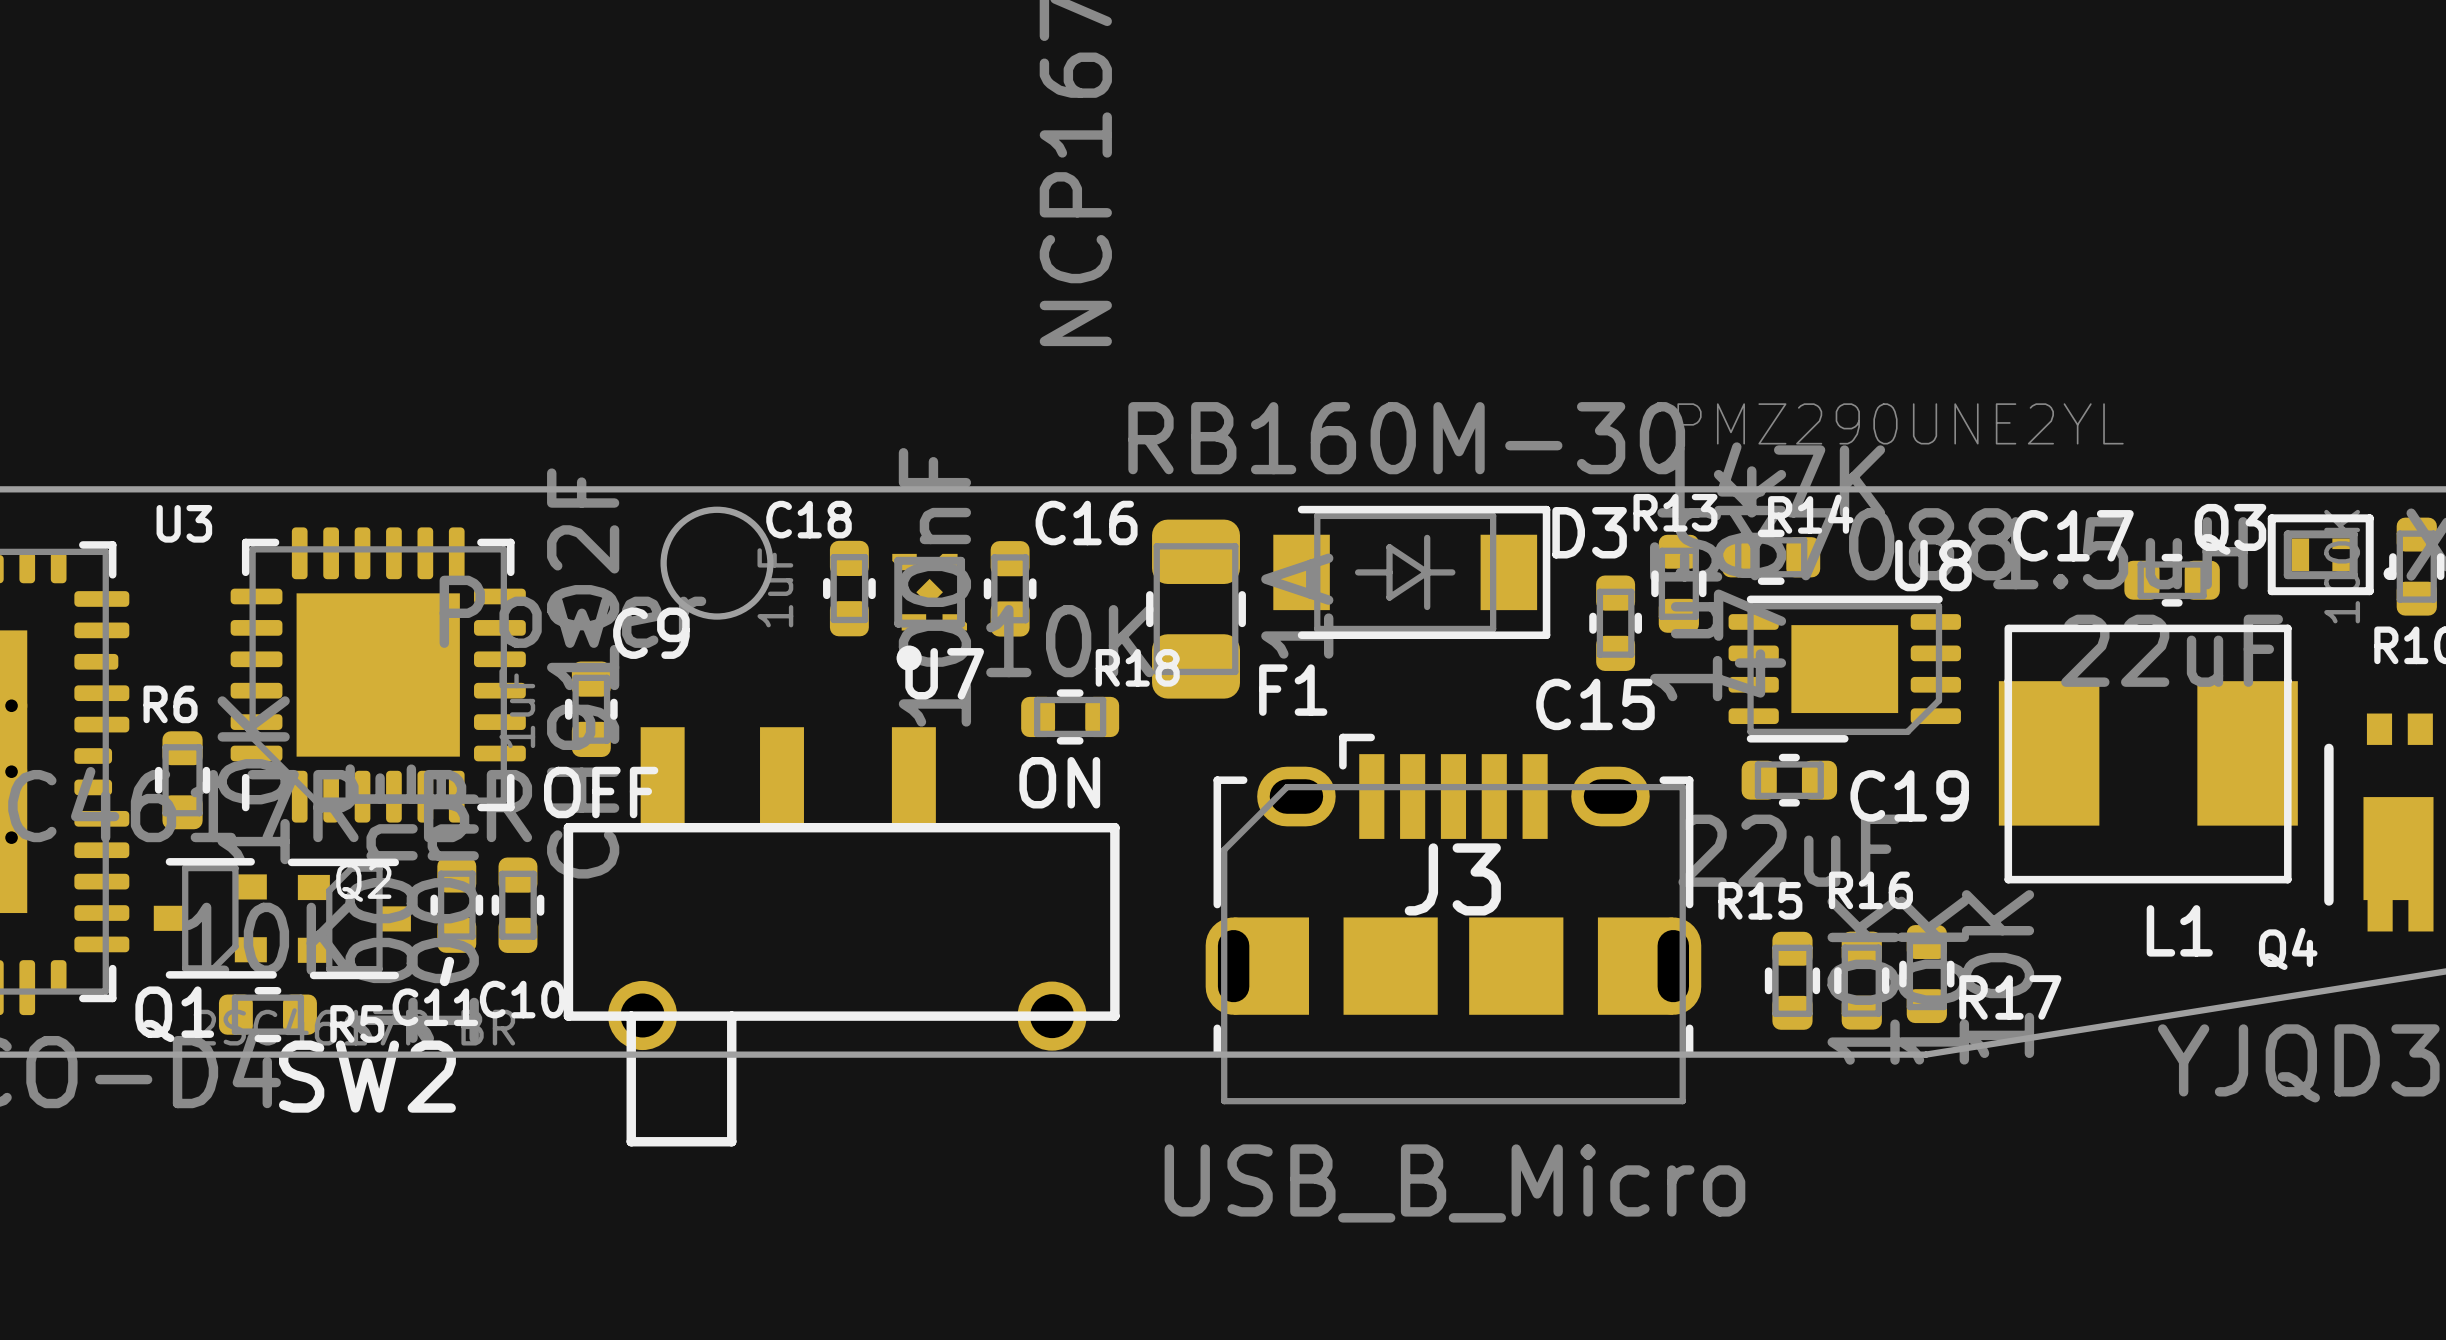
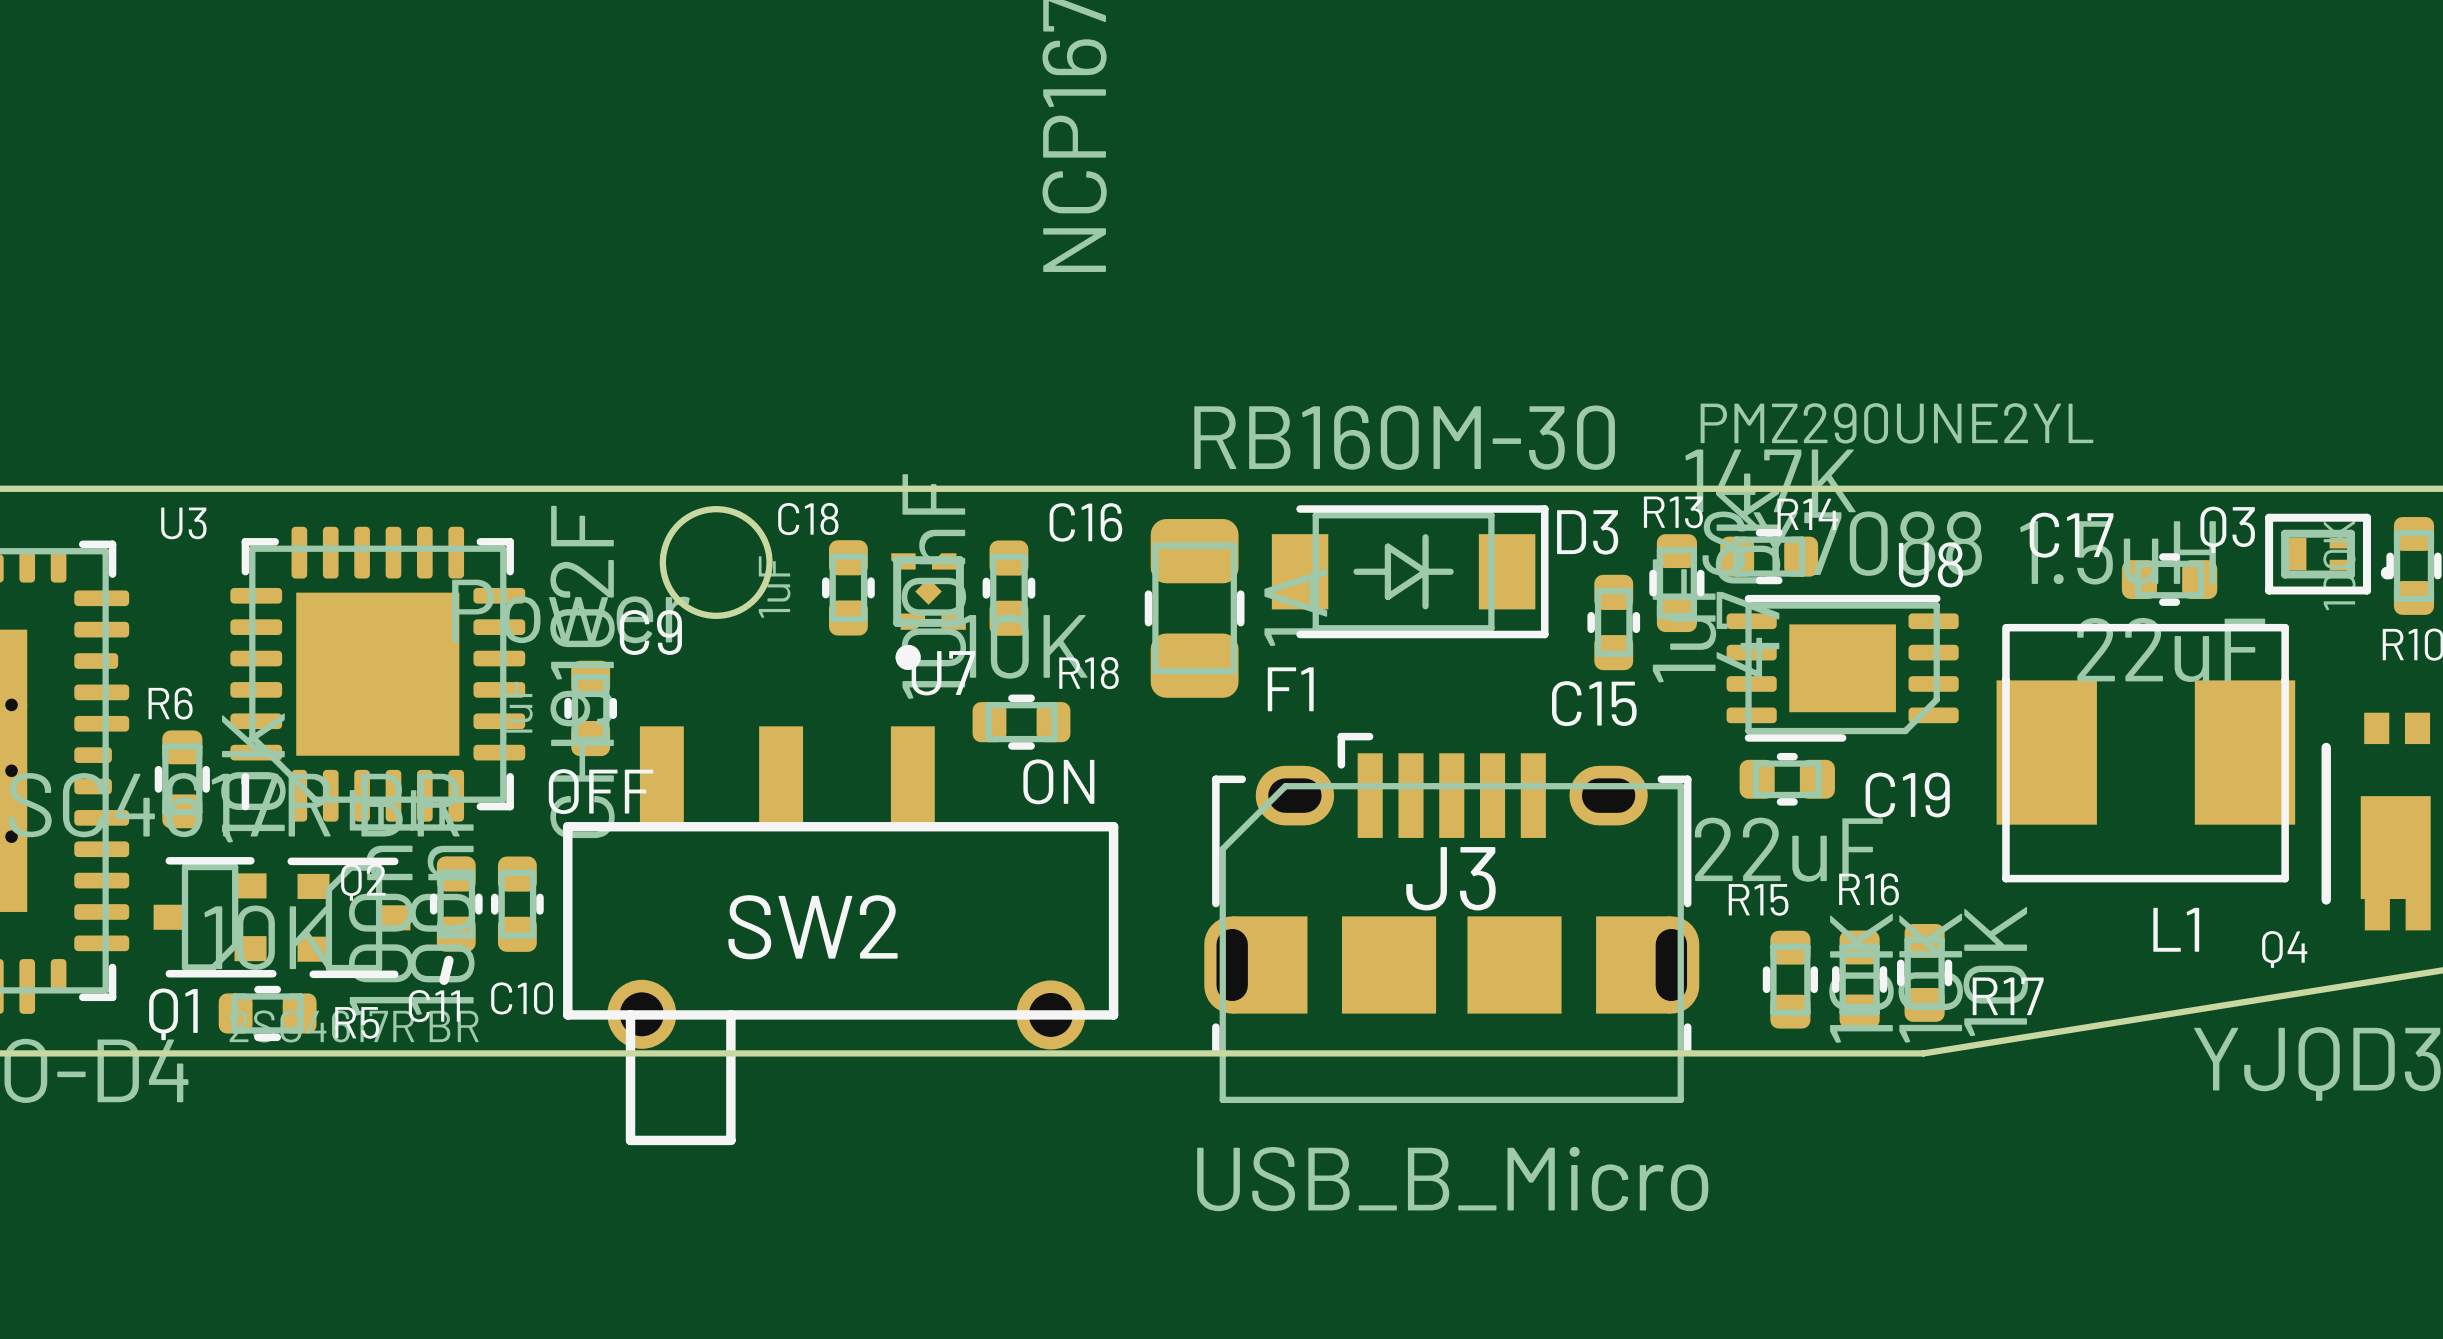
R18 position: (1070, 716) -> (1021, 722)
SW2 name position: SW2 (367, 1076) -> SW2 (812, 927)

